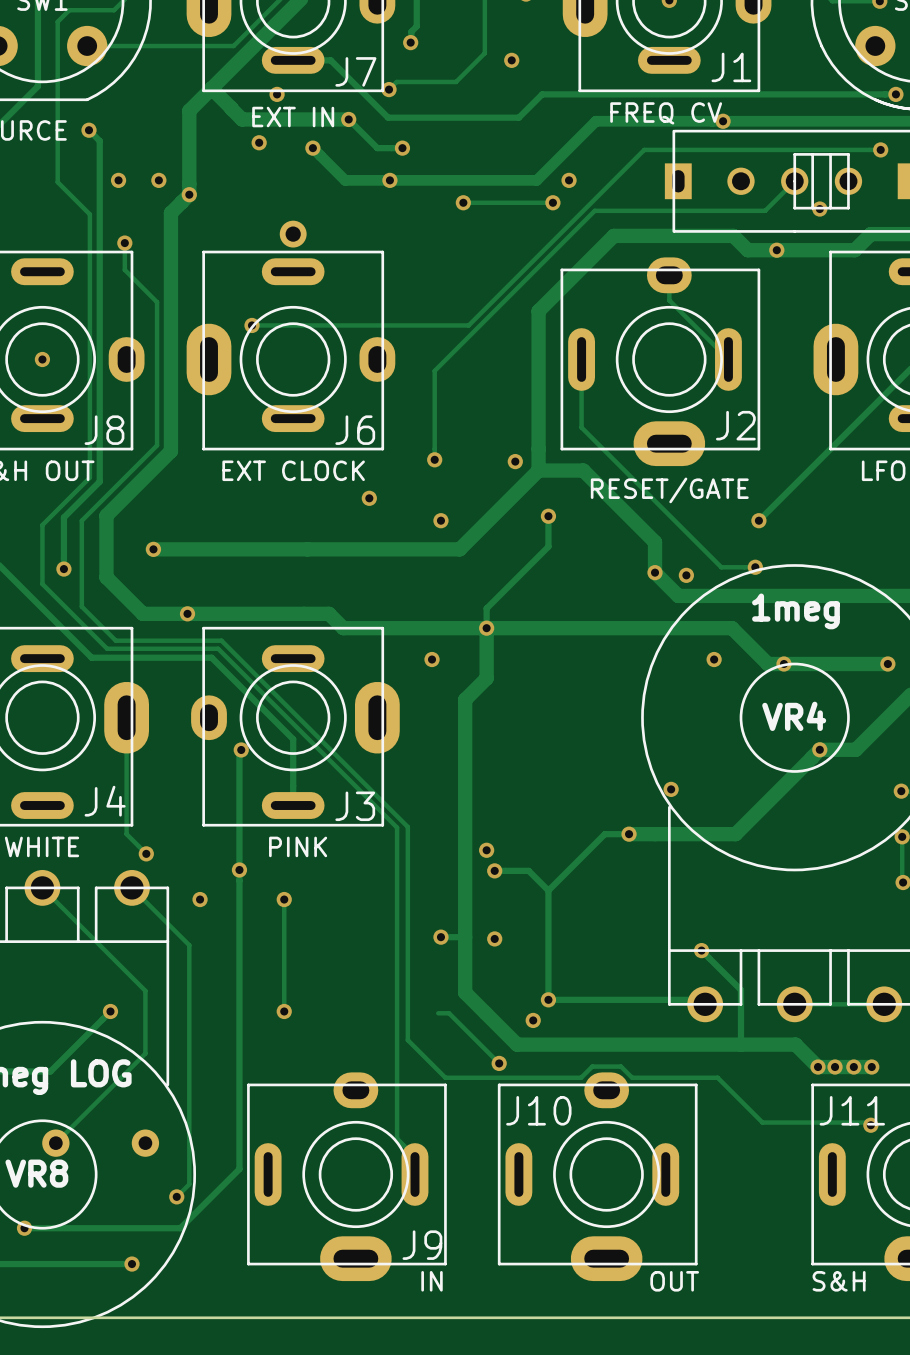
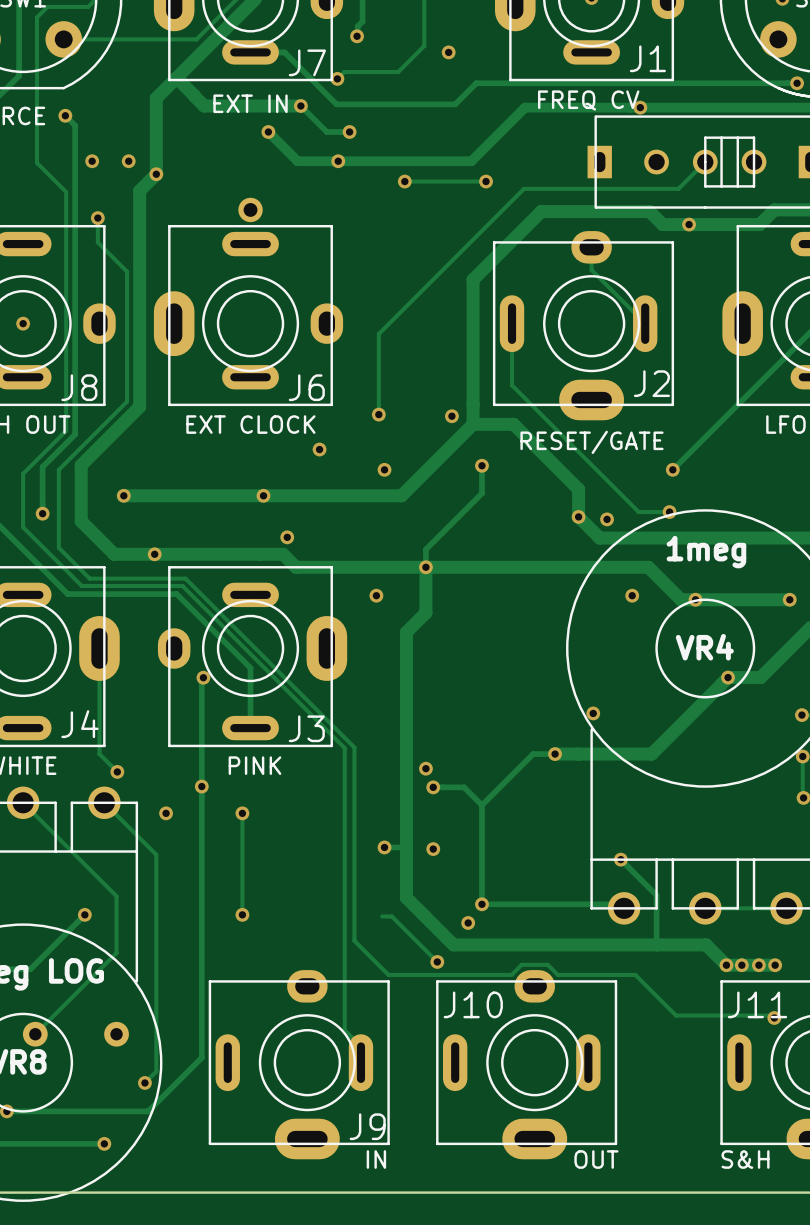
via: (277, 94) -> none
via: (259, 142) -> none
track: (880, 149) (644, 149) (468, 325) (252, 325) -> none
via: (880, 149) -> none
via: (569, 180) -> none
via: (819, 209) -> none
via: (252, 325) -> none
via: none -> (263, 495)
via: none -> (287, 537)

